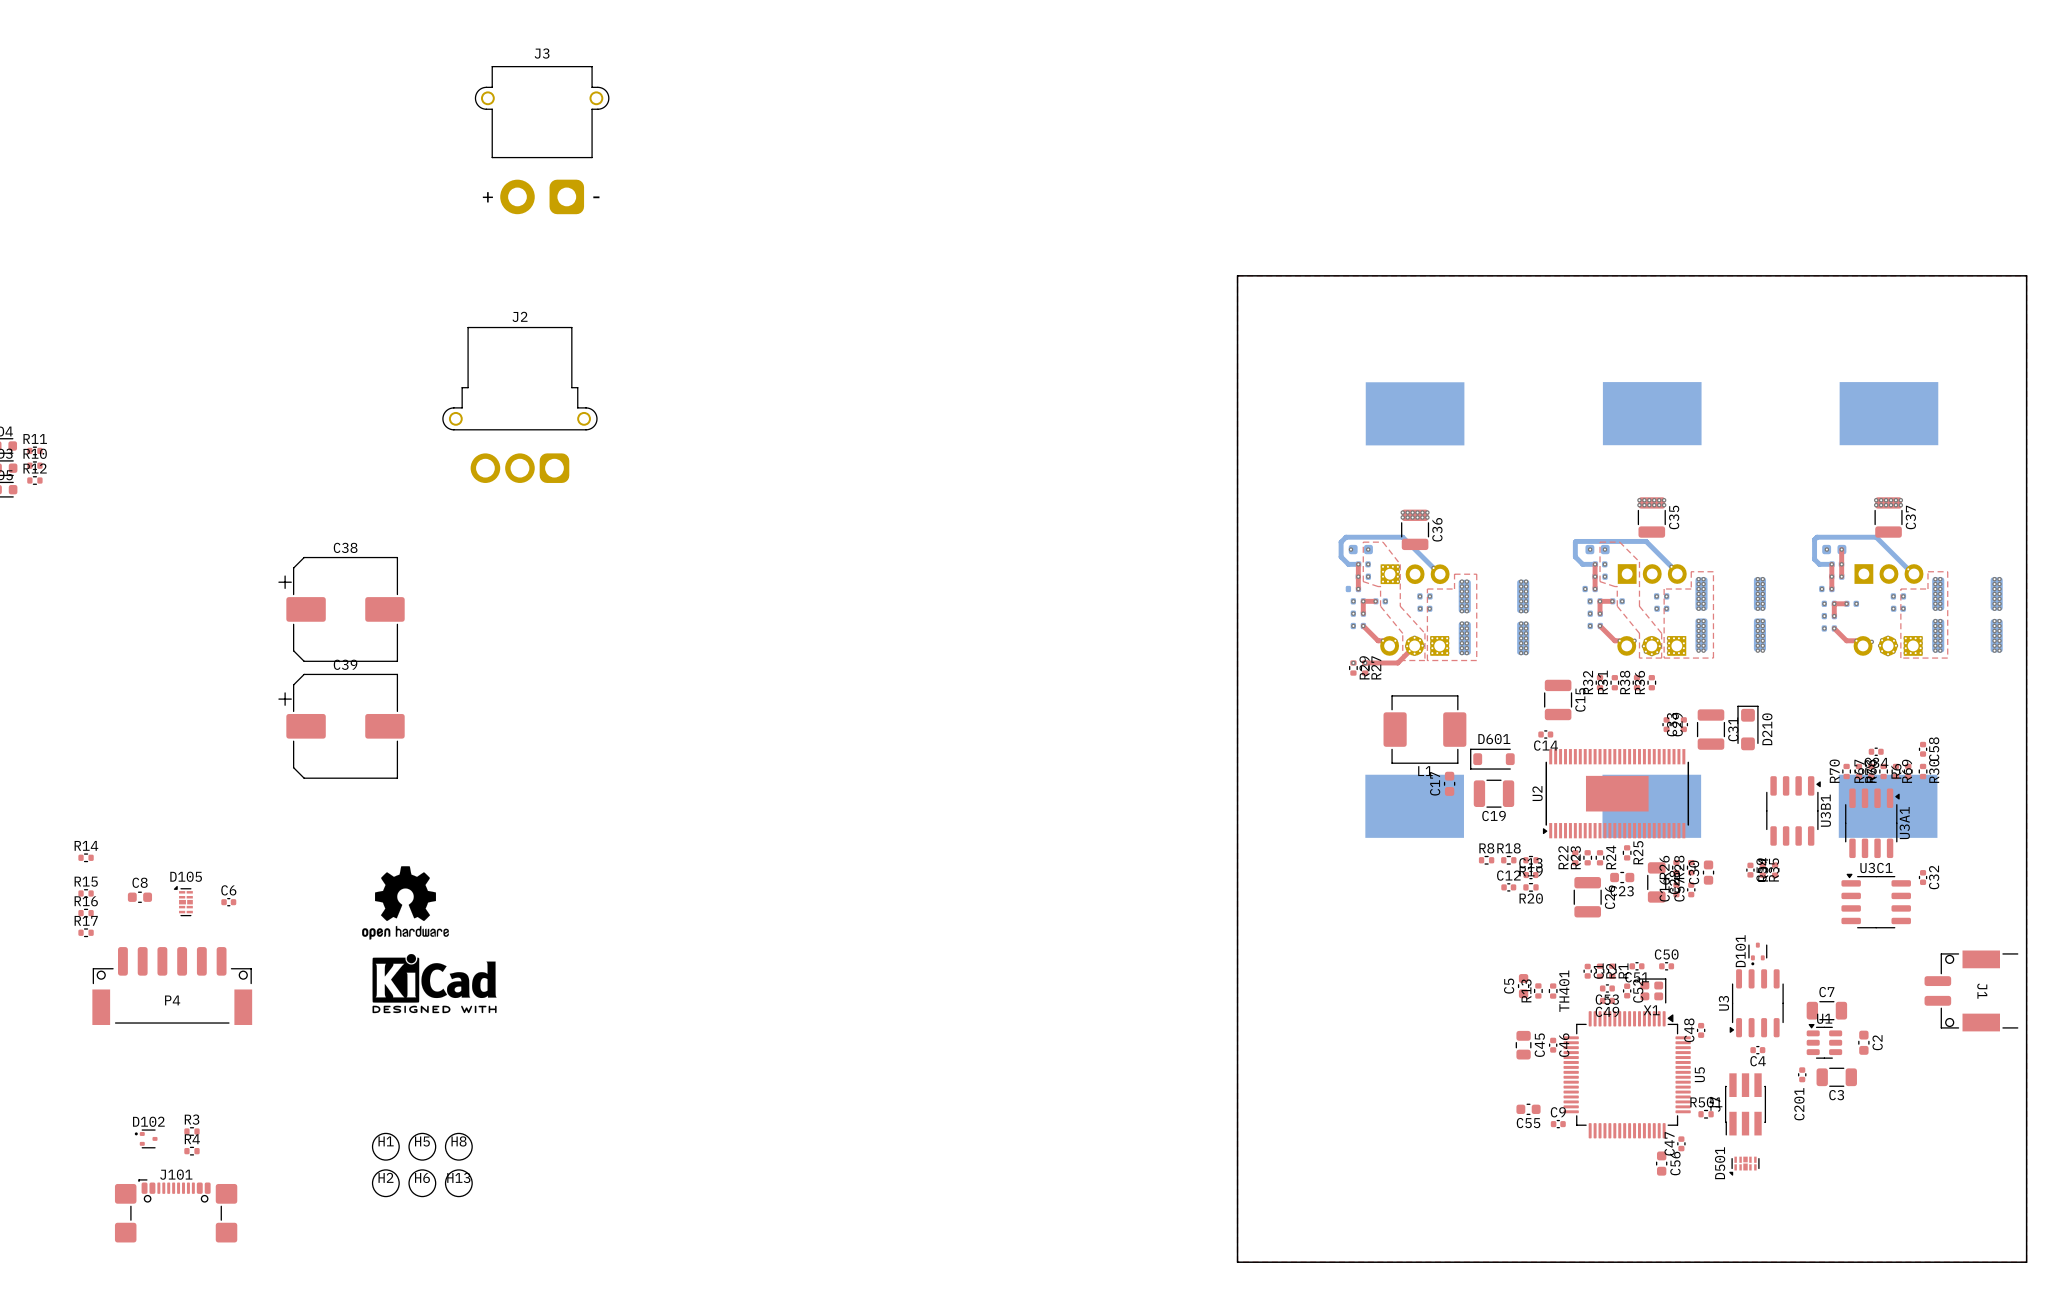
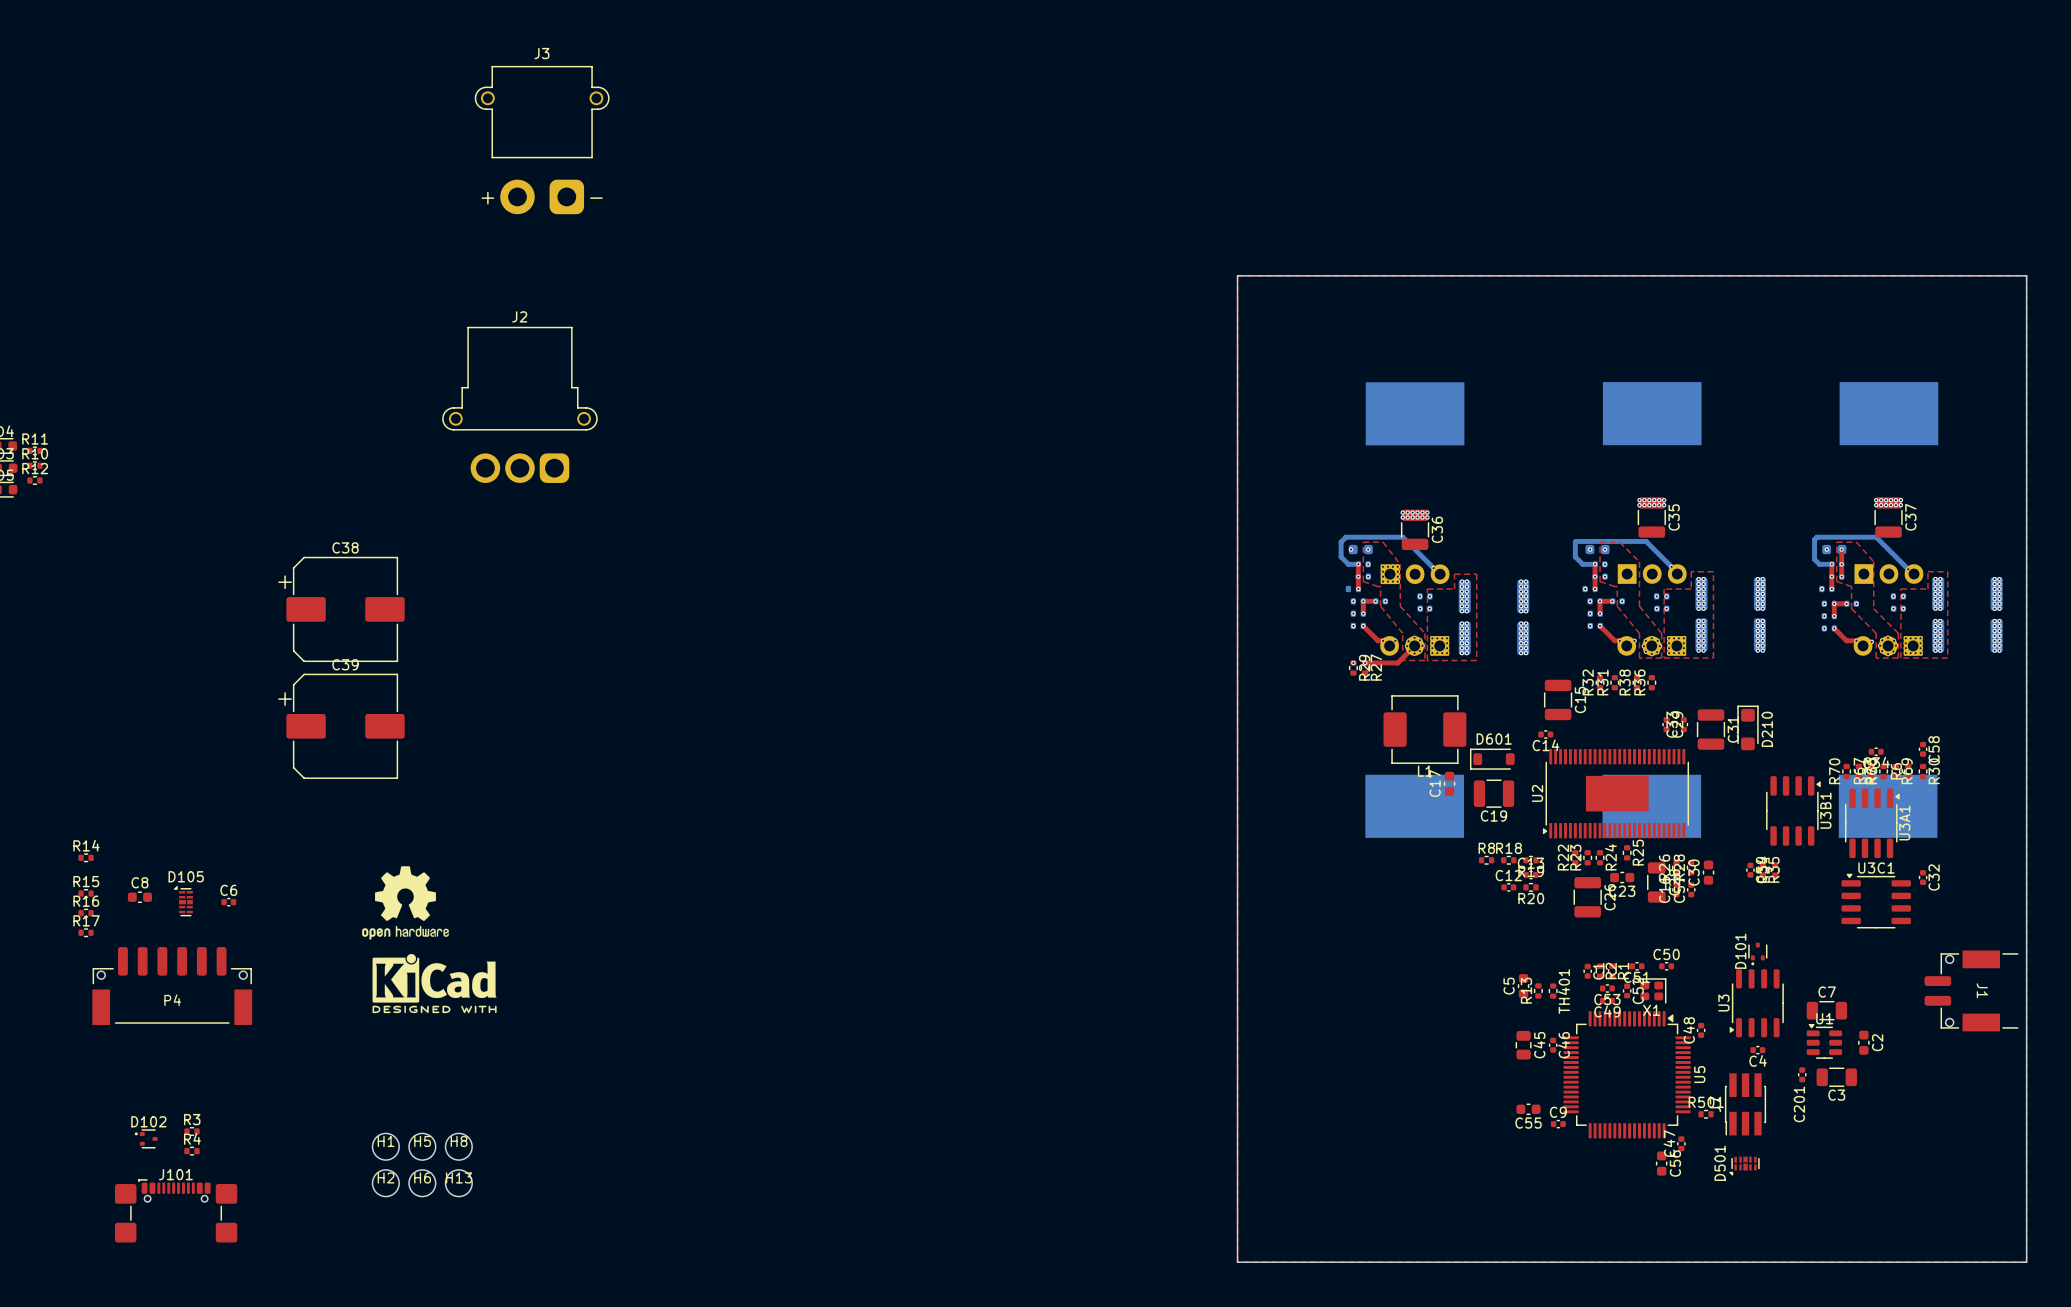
top zone outline: none -> (1836, 542) (1836, 581) (1851, 586) (1851, 608) (1876, 633) (1876, 658) (1898, 658) (1898, 633) (1873, 608) (1873, 561) (1856, 542) (1836, 542)

